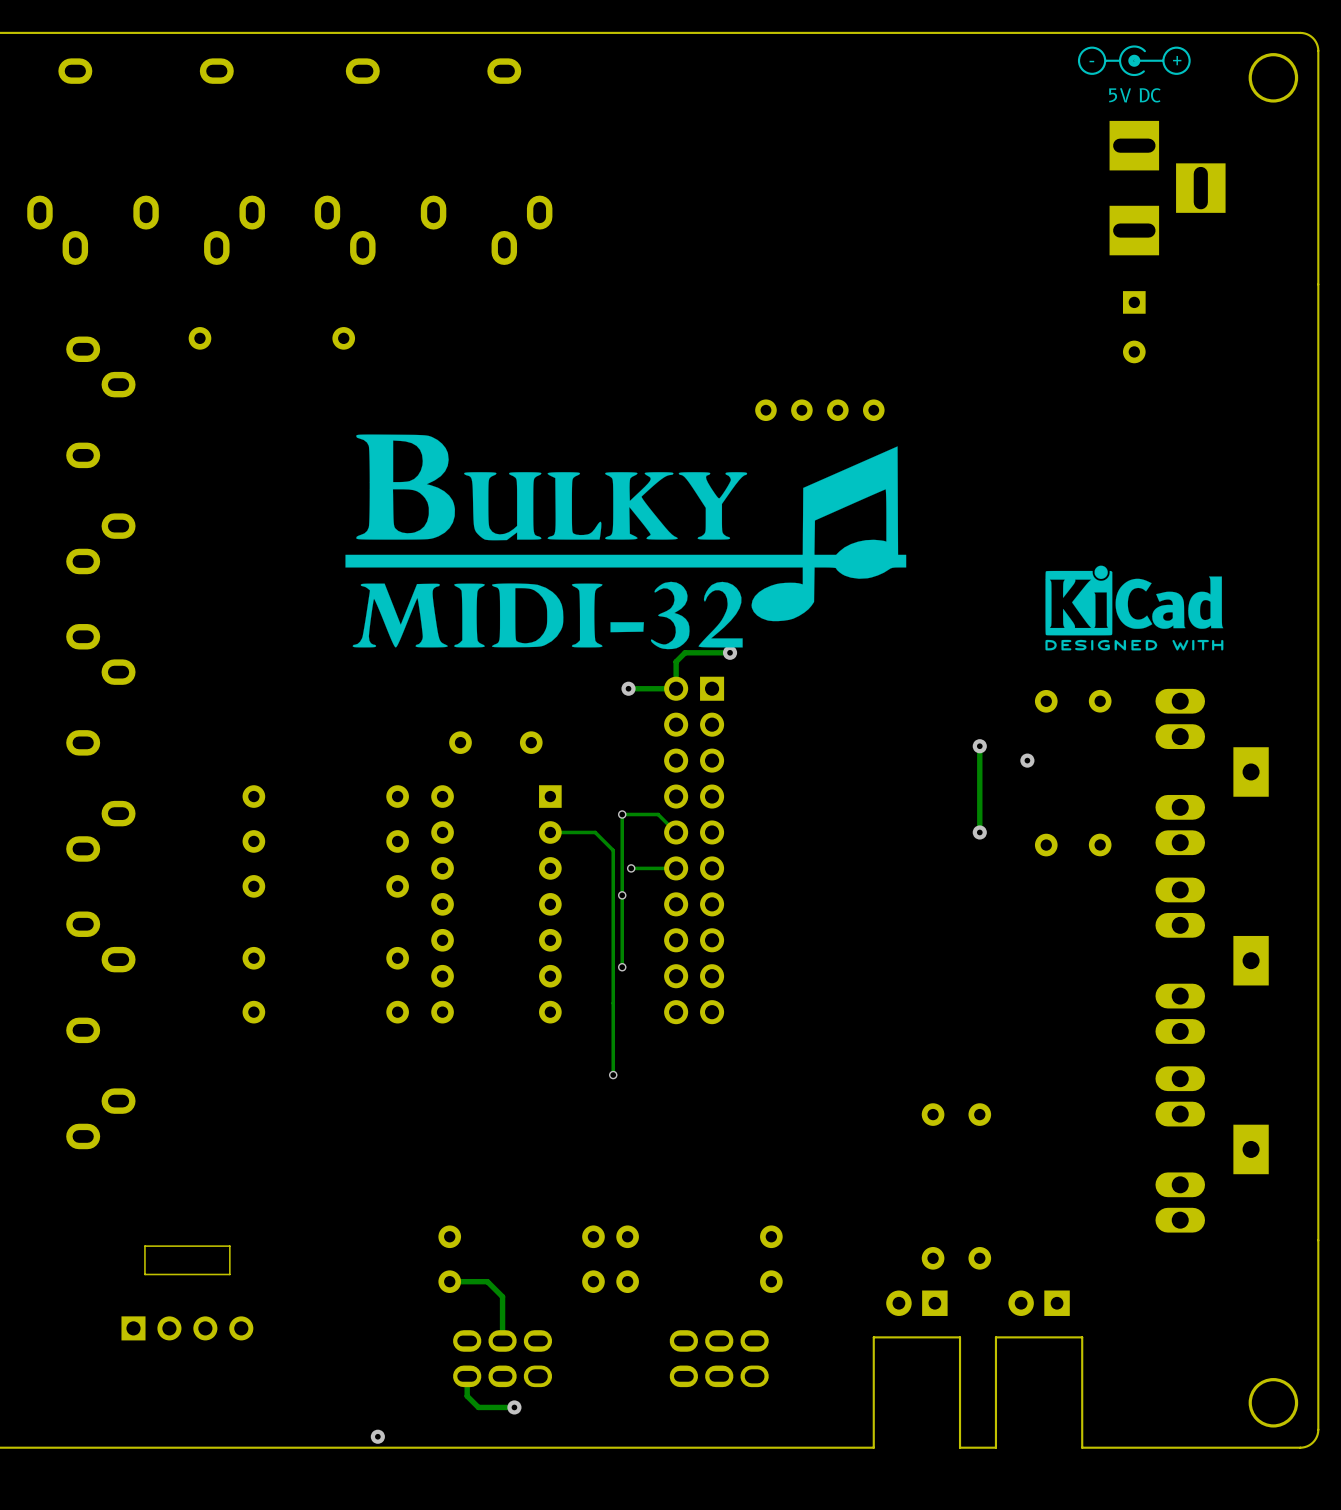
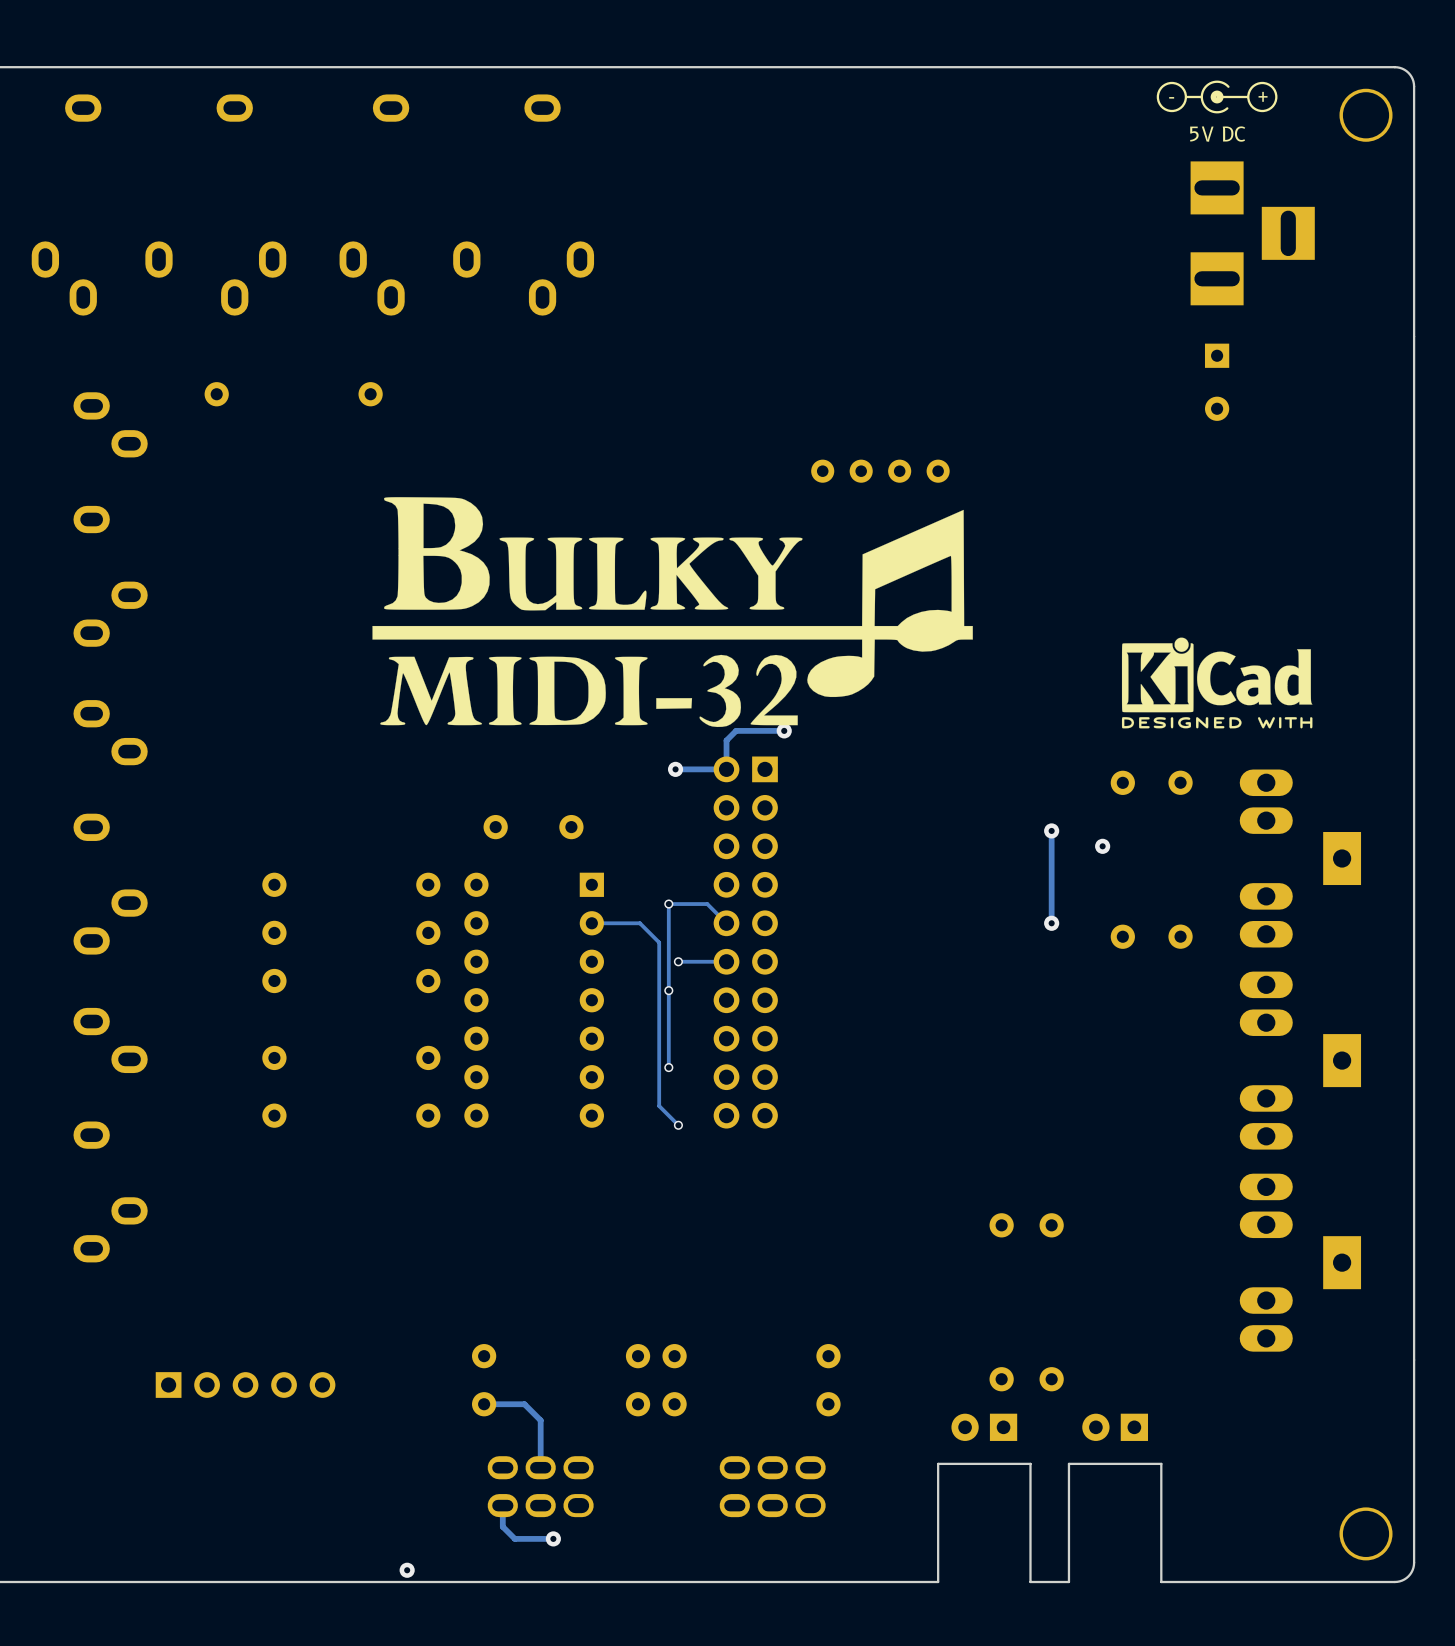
track: (613, 1003) (613, 1075) -> (659, 1106) (678, 1125)
via position: (613, 1075) -> (678, 1125)
board edge: (229, 1246) (144, 1246) (144, 1274) (229, 1274) (229, 1246) -> none
part: none -> (245, 1385)
part: (187, 1328) -> none

